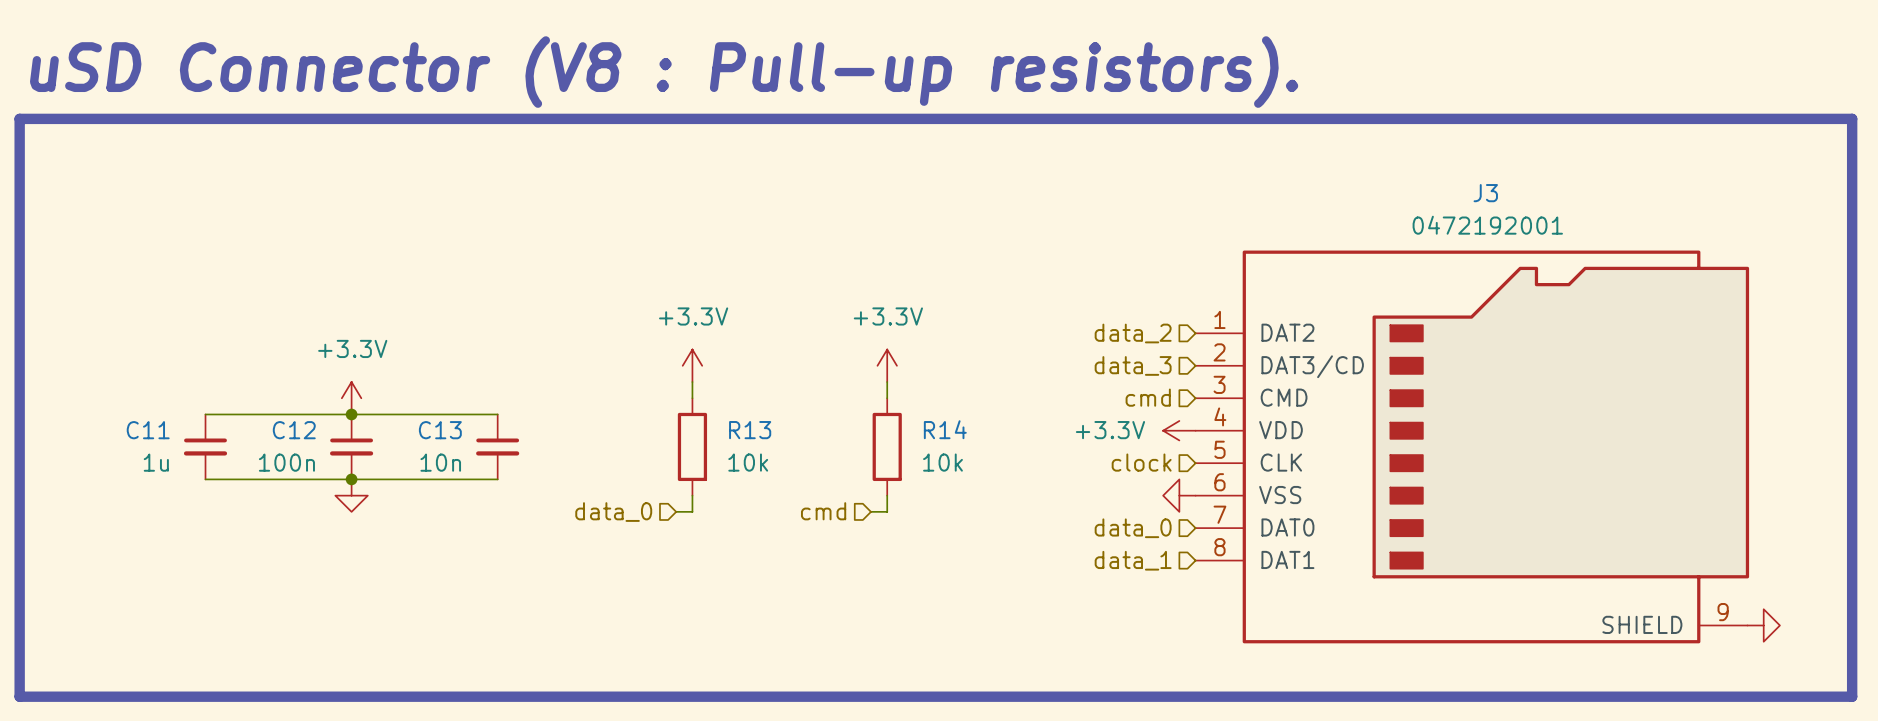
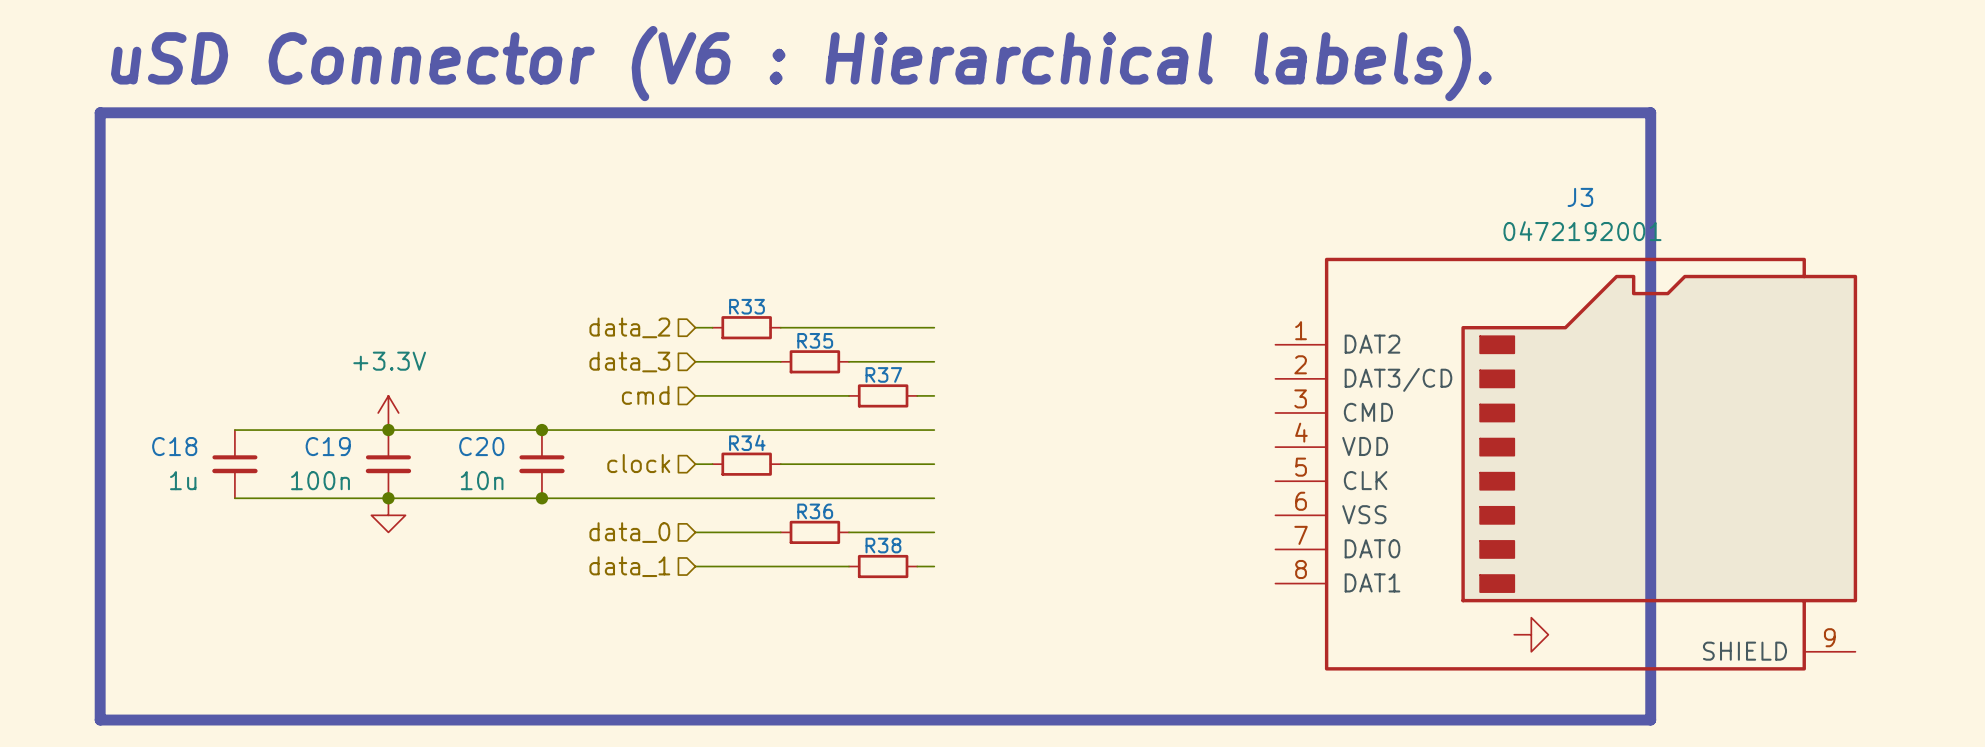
text: uSD Connector (V8 : Pull-up resistors). (664, 72) -> uSD Connector (V6 : Hierarchical labels). (801, 63)
line: (19, 118) (1852, 118) (1852, 696) (19, 696) (19, 118) -> (100, 112) (100, 720) (1650, 720) (1650, 112) (100, 112)
hierarchical label: none -> data_2 (629, 327)
wire: none -> (695, 327) (712, 327)
R33: none -> (746, 327)
wire: none -> (780, 327) (934, 327)
hierarchical label: data_2 (1133, 333) -> none
hierarchical label: none -> data_3 (629, 361)
wire: none -> (695, 361) (780, 361)
R35: none -> (814, 361)
wire: none -> (849, 361) (934, 361)
power symbol: +3.3V (692, 365) -> none
power symbol: +3.3V (887, 365) -> none
hierarchical label: data_3 (1133, 365) -> none
wire: none -> (695, 395) (849, 395)
wire: (692, 382) (692, 398) -> none
R37: none -> (883, 395)
wire: none -> (917, 395) (934, 395)
wire: (887, 382) (887, 398) -> none
hierarchical label: cmd (1148, 397) -> none
wire: none -> (541, 430) (934, 430)
junction: none -> (541, 430)
C11 name: C11 (148, 430) -> C18 (174, 446)
C12 name: C12 (294, 430) -> C19 (328, 446)
C13 name: C13 (440, 430) -> C20 (481, 446)
power symbol: +3.3V (1179, 430) -> none
hierarchical label: none -> clock (638, 463)
wire: none -> (695, 464) (712, 464)
R13: 10k (692, 446) -> none
R34: none -> (746, 464)
wire: none -> (780, 464) (934, 464)
R14: 10k (887, 446) -> none
hierarchical label: clock (1141, 462) -> none
wire: none -> (541, 498) (934, 498)
junction: none -> (541, 498)
wire: (692, 495) (692, 511) -> (780, 532) (746, 532)
wire: (887, 495) (887, 511) (870, 511) -> (849, 532) (934, 532)
power symbol: (1179, 495) -> none
wire: none -> (695, 532) (729, 532)
R36: none -> (814, 532)
hierarchical label position: cmd (823, 511) -> cmd (645, 395)
hierarchical label position: data_0 (613, 512) -> data_0 (629, 532)
hierarchical label: data_0 (1133, 528) -> none
hierarchical label: none -> data_1 (629, 566)
wire: none -> (695, 566) (849, 566)
R38: none -> (883, 566)
wire: none -> (917, 566) (934, 566)
hierarchical label: data_1 (1133, 560) -> none
power symbol: none -> (1531, 634)
power symbol: (1763, 625) -> none

